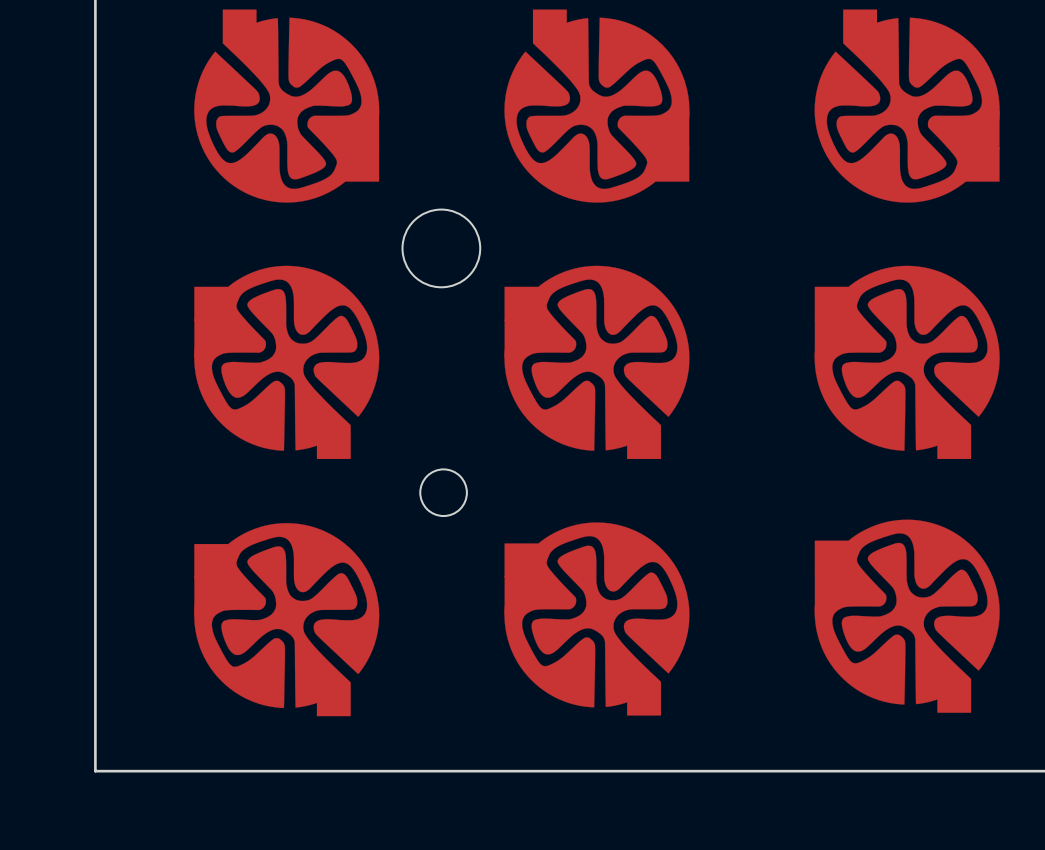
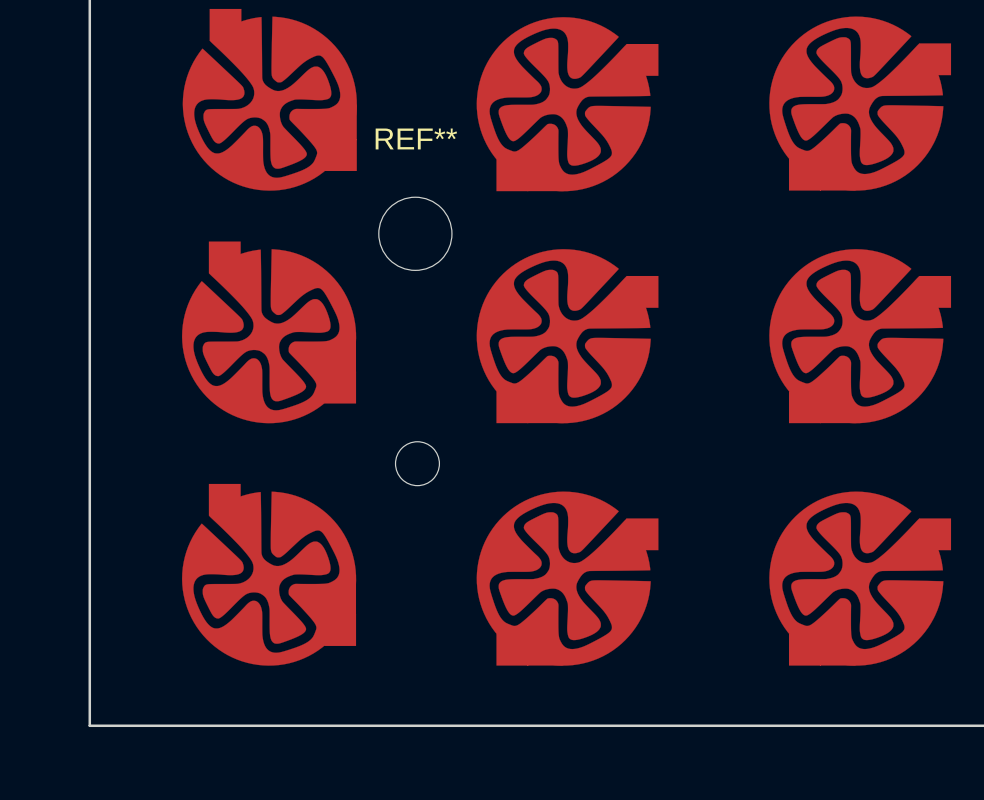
part rotation: 0° (596, 106) -> 90° clockwise (567, 104)
part rotation: 0° (907, 106) -> 90° clockwise (860, 103)
REF** name: none -> REF** (416, 138)
part rotation: 0° (286, 362) -> 180° (269, 332)
part rotation: 0° (596, 362) -> 90° counterclockwise (567, 336)
part rotation: 0° (907, 362) -> 90° counterclockwise (860, 336)
part rotation: 0° (907, 616) -> 90° counterclockwise (860, 578)
part rotation: 0° (286, 619) -> 180° (269, 574)
part rotation: 0° (596, 619) -> 90° counterclockwise (567, 578)

